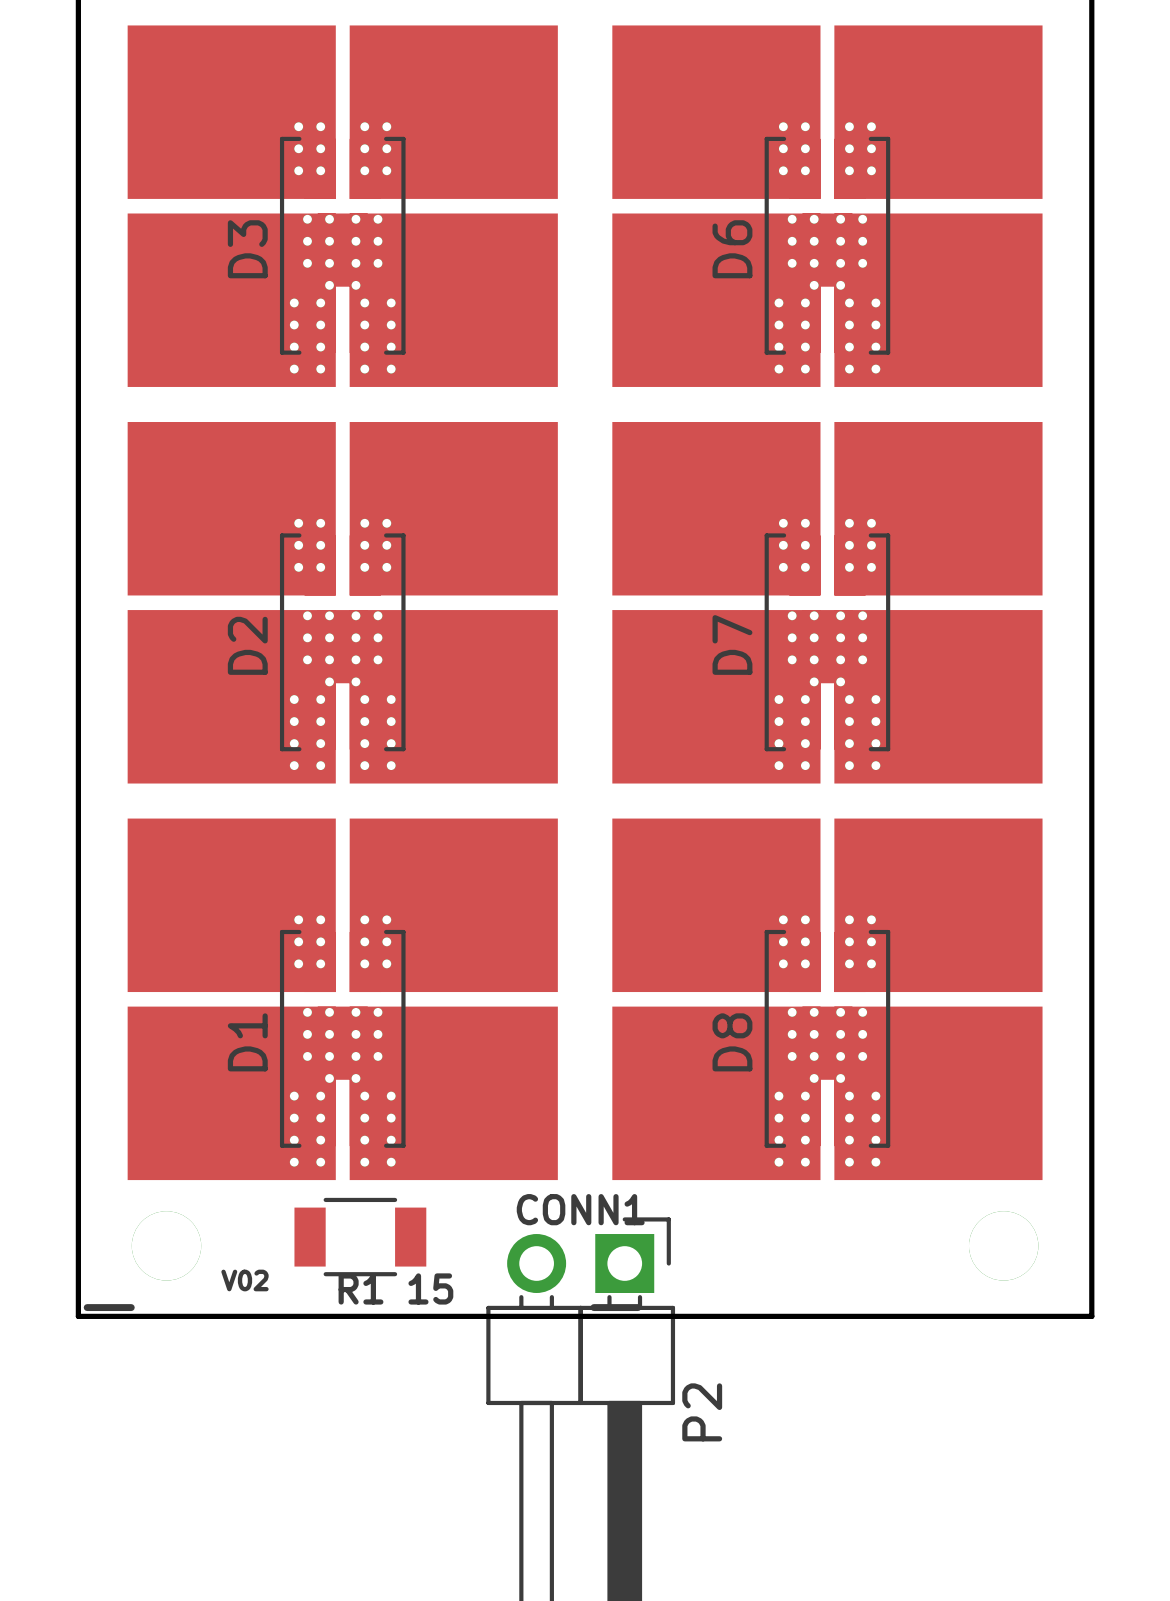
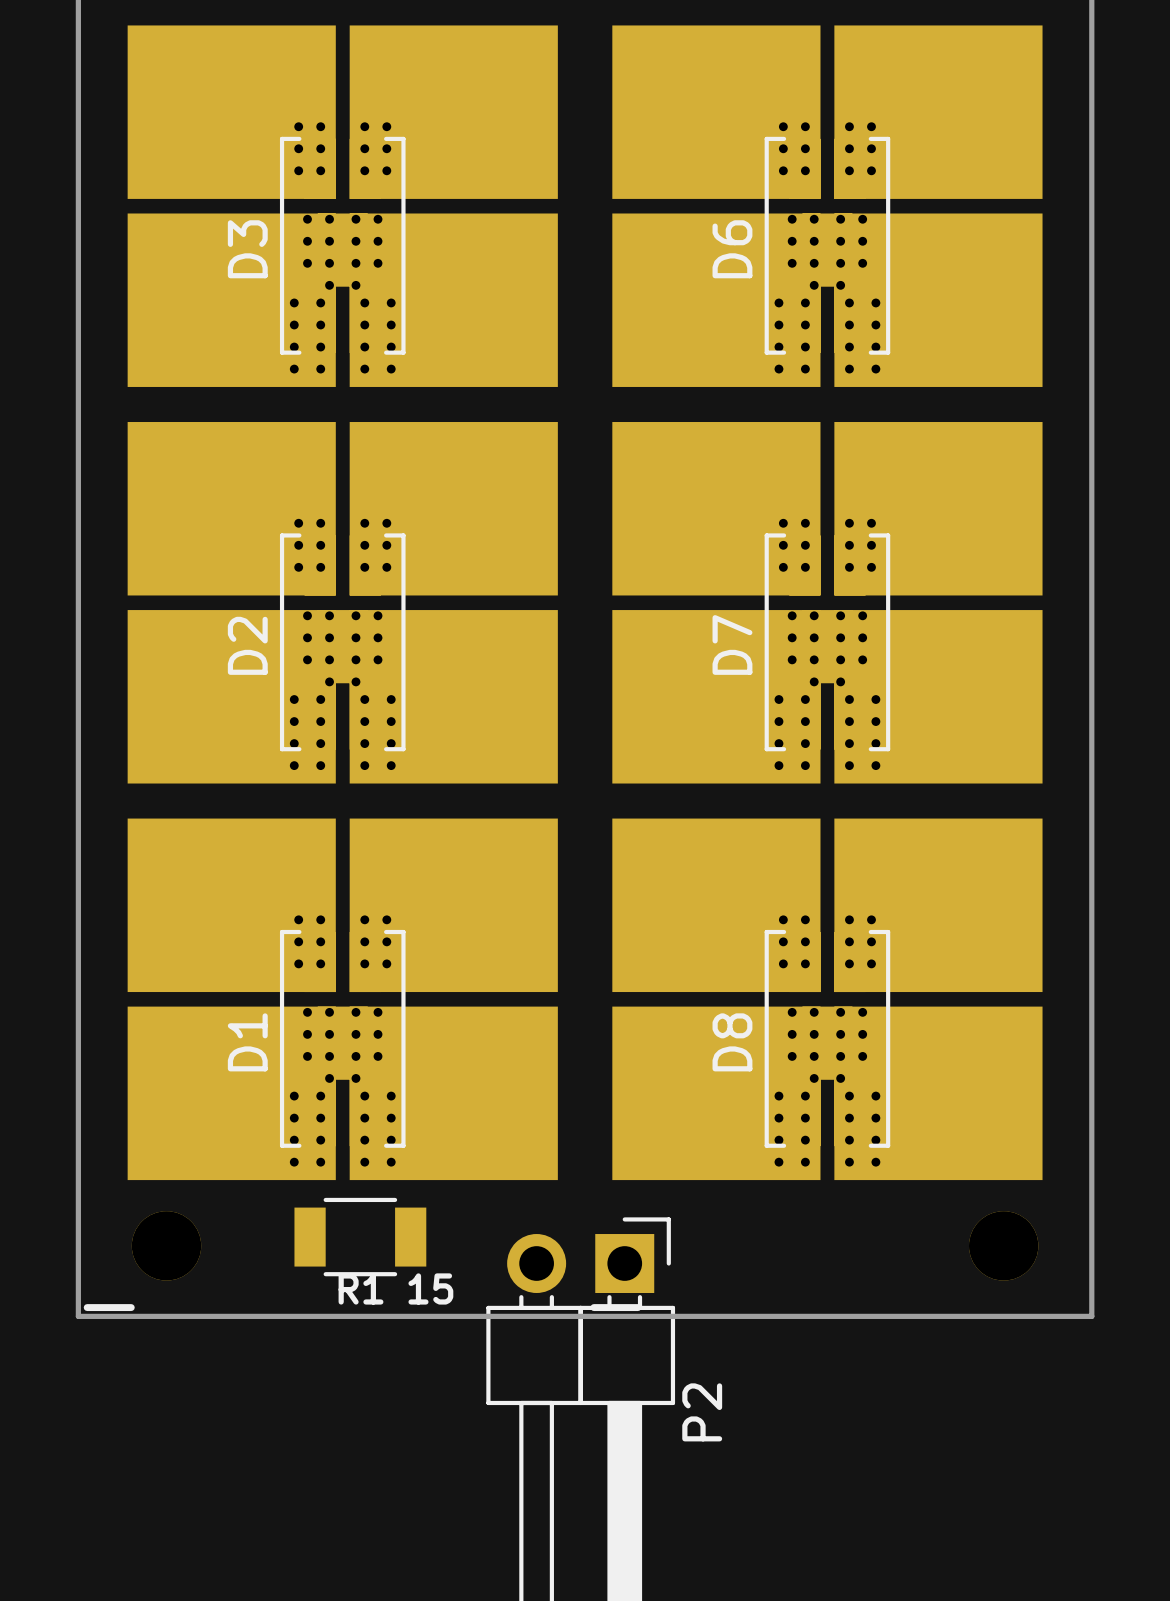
P2 value: CONN1 (580, 1209) -> none
text: V02 (244, 1280) -> none

